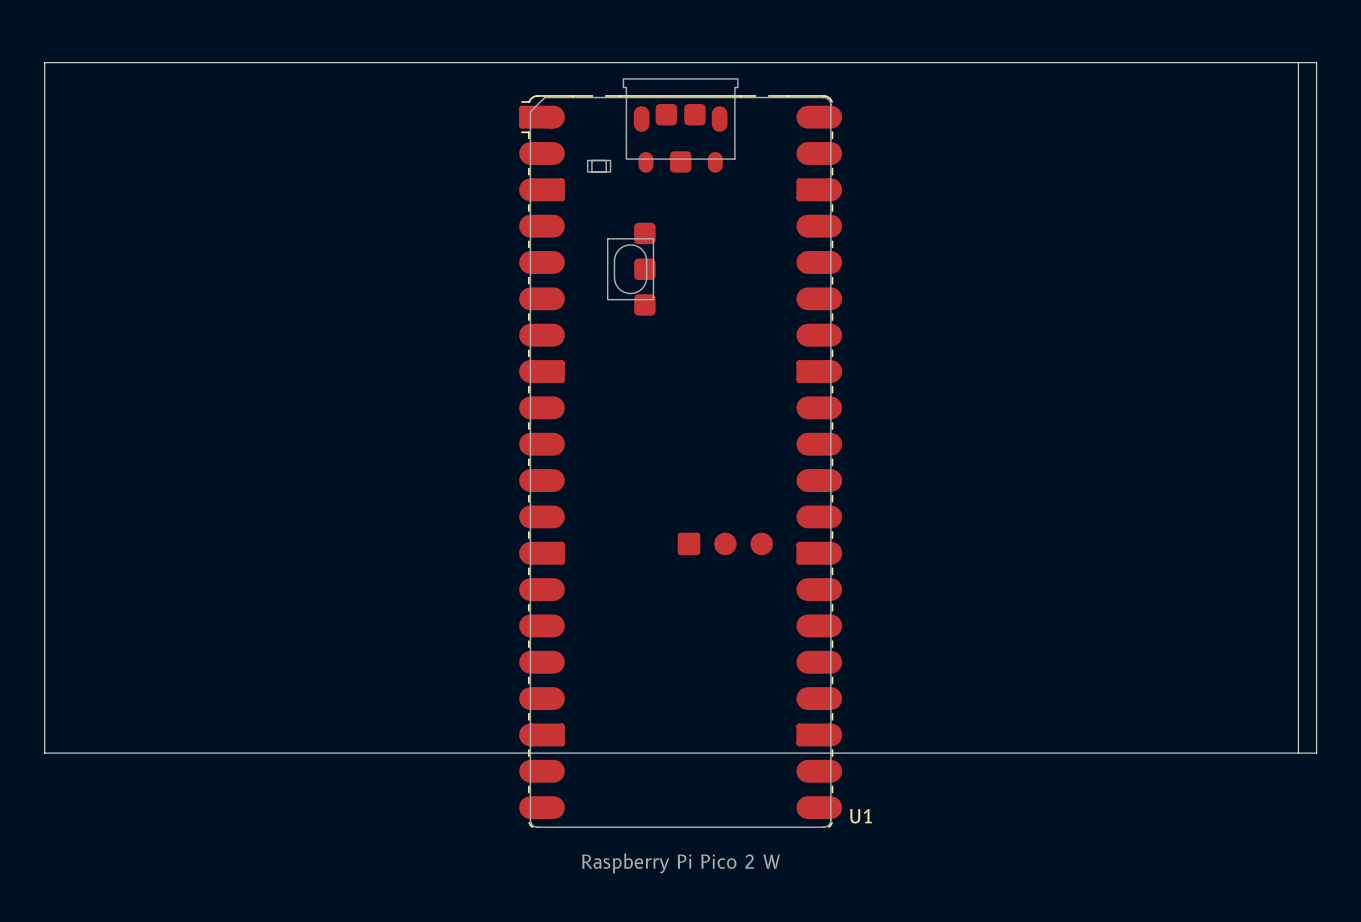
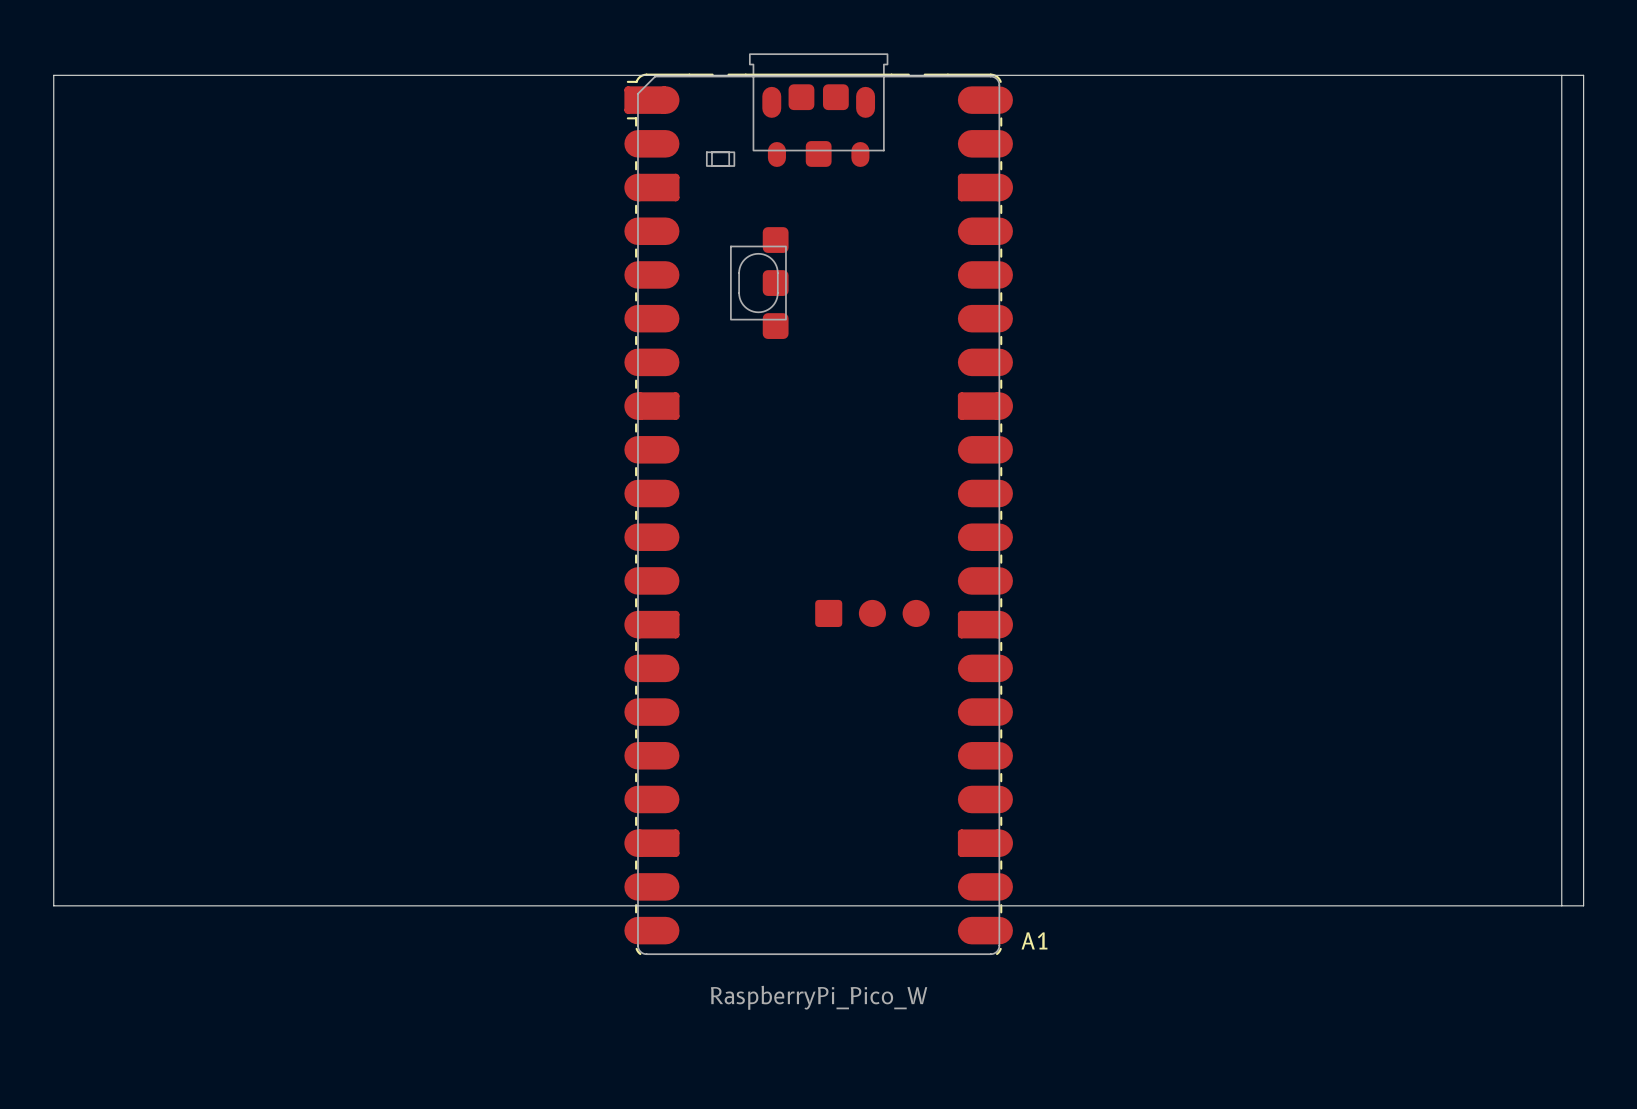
A1: none -> RaspberryPi_Pico_W (818, 504)
U1: Raspberry Pi Pico 2 W (680, 453) -> none

